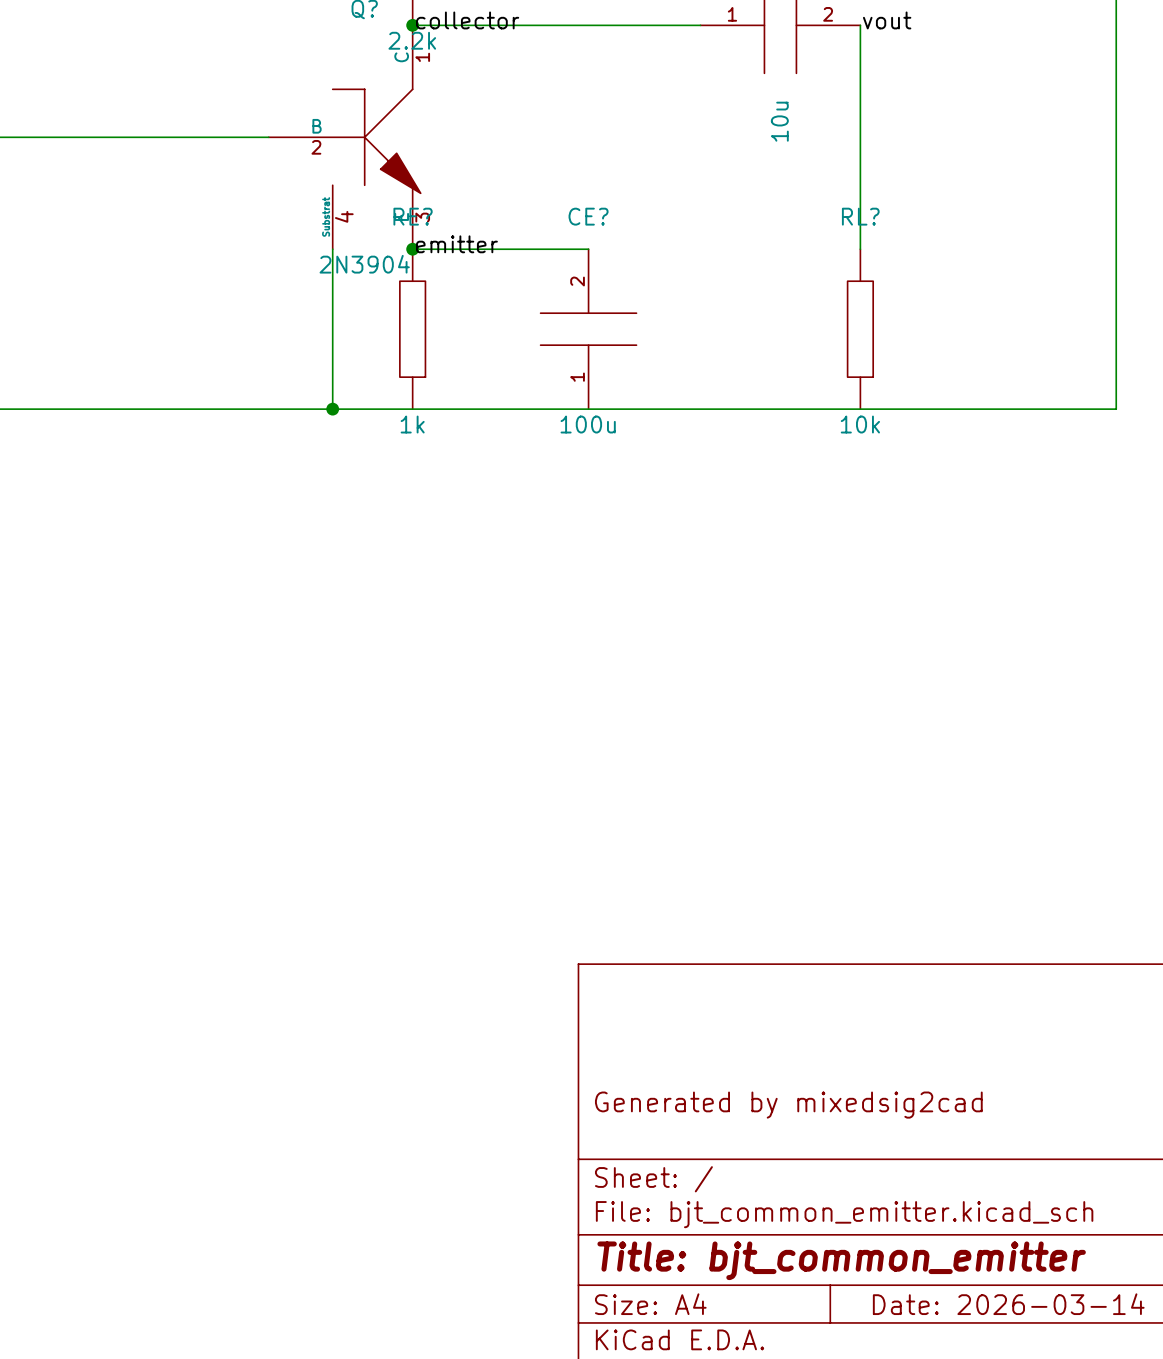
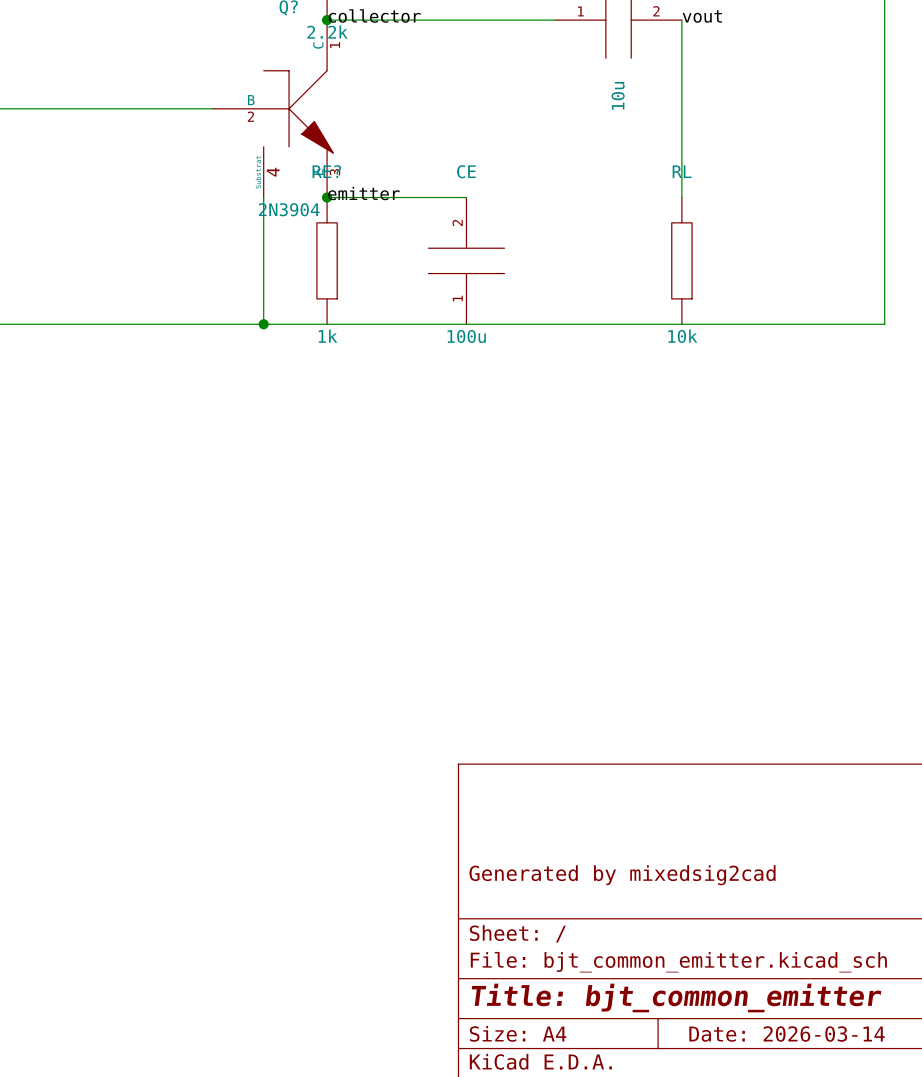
CE? name: CE? (588, 216) -> CE (466, 171)
RL? name: RL? (860, 216) -> RL (682, 171)

